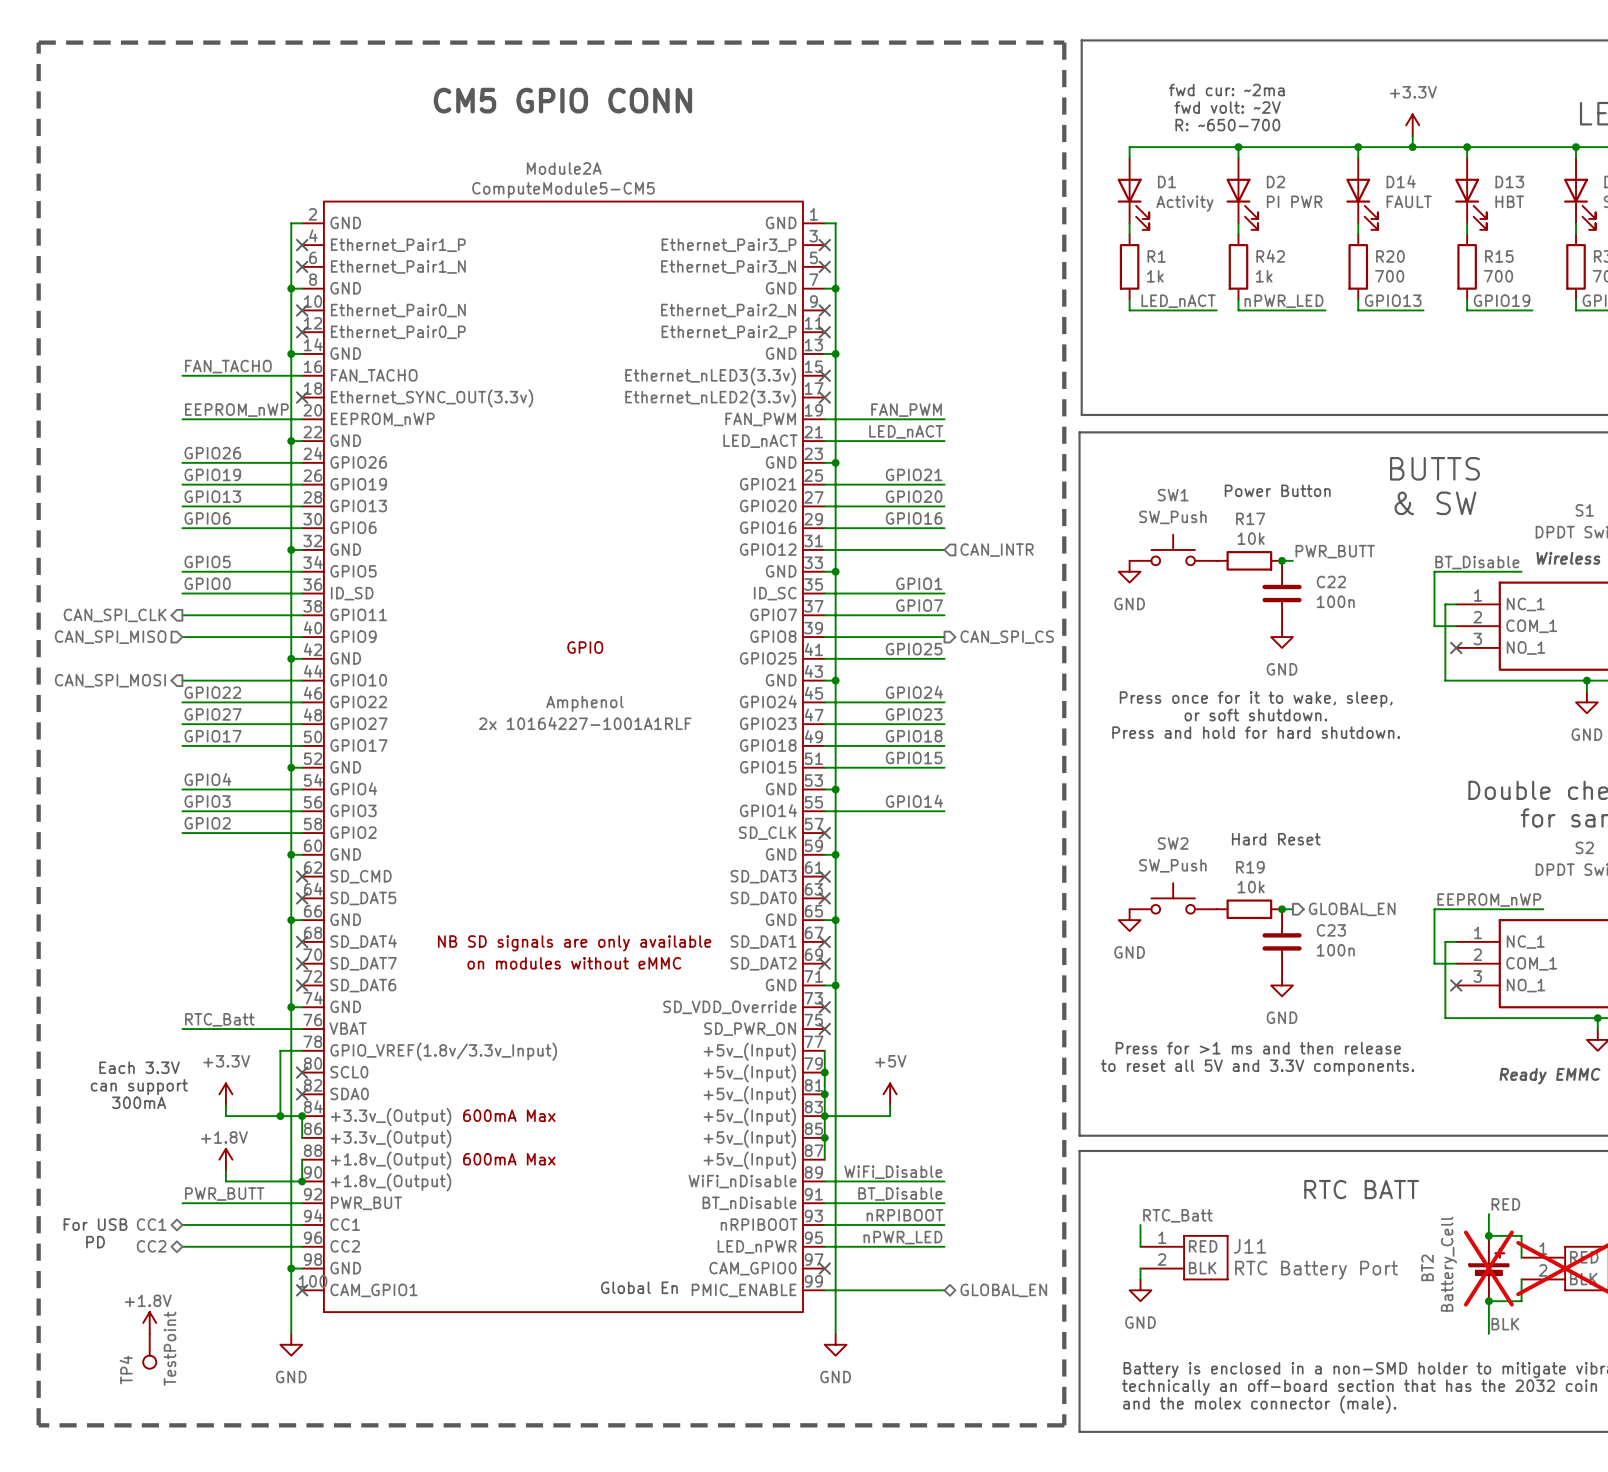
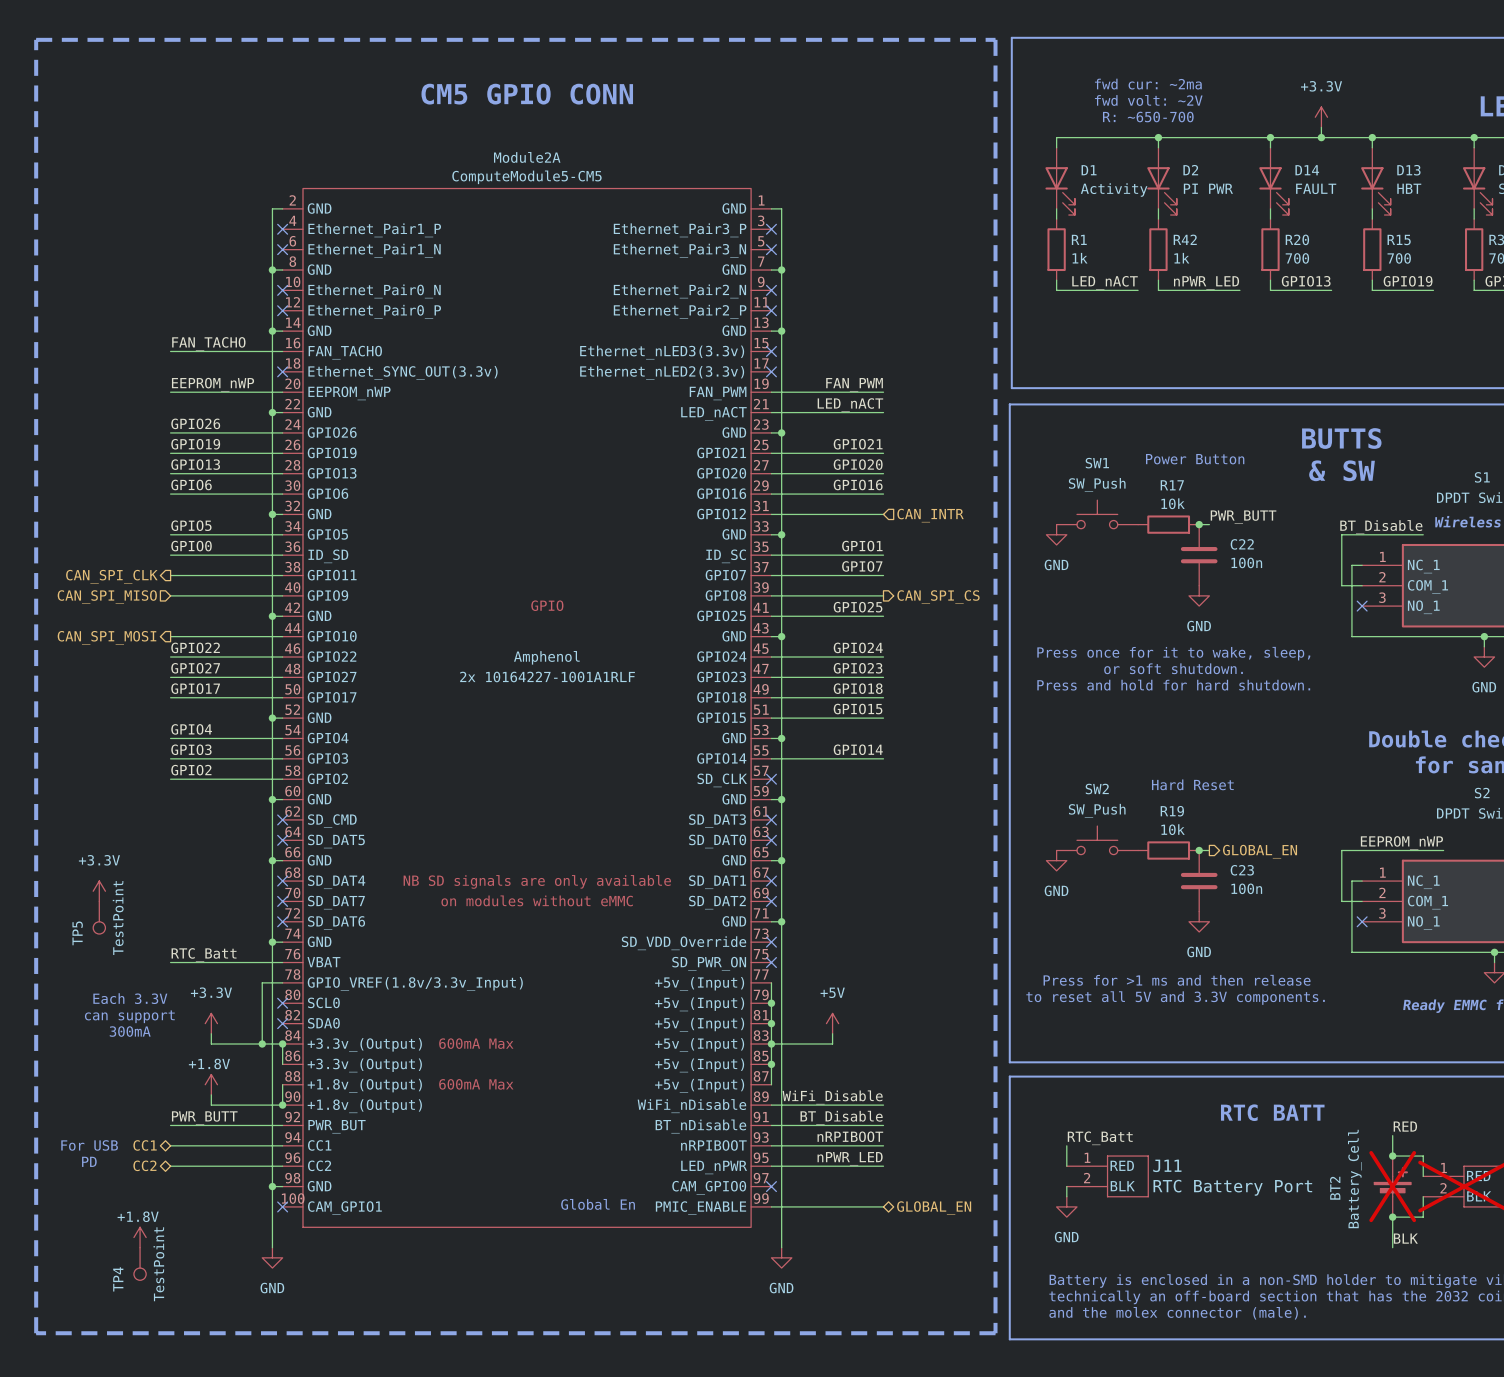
power symbol: none -> +3.3V (99, 891)
TP5: none -> TestPoint (99, 917)

